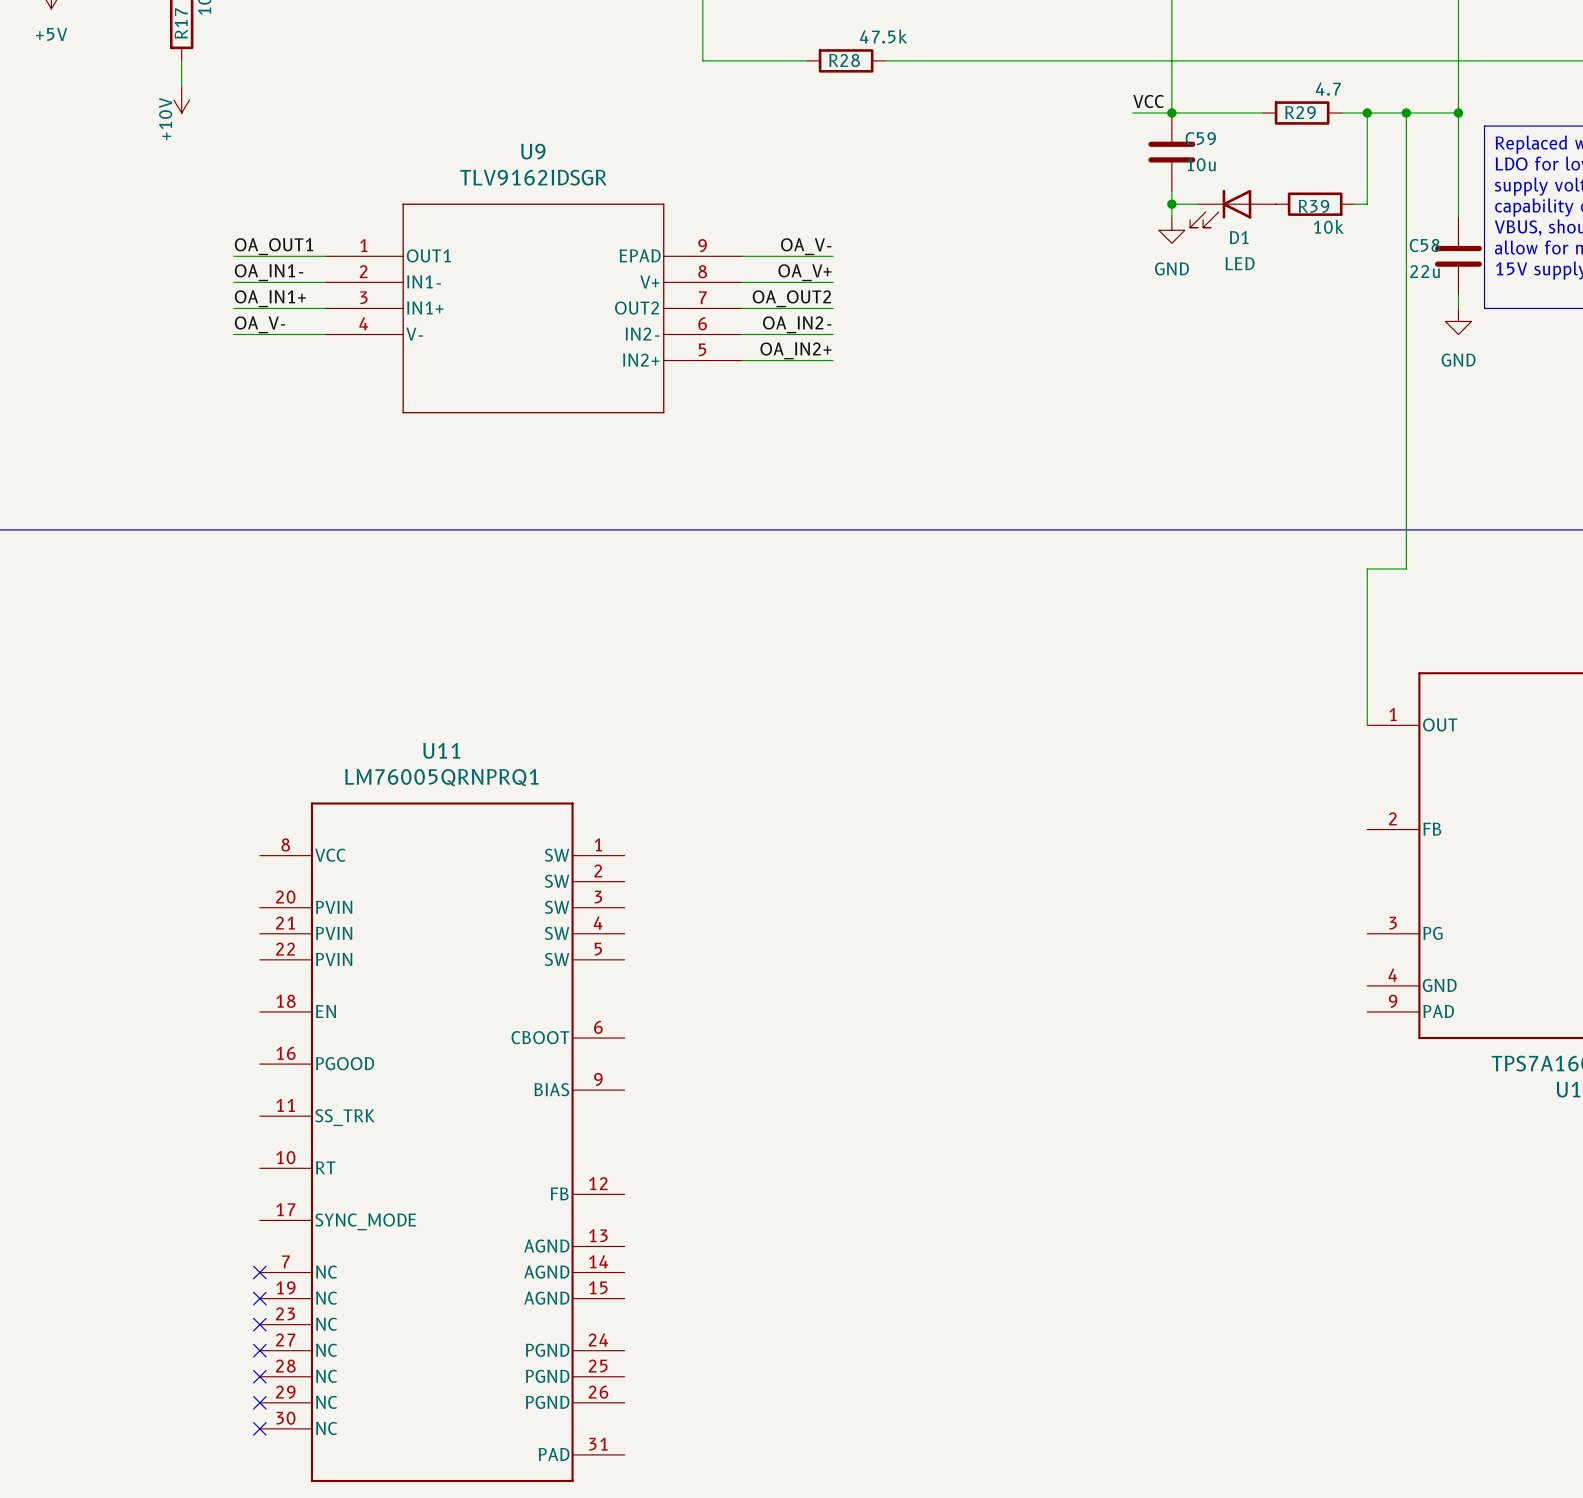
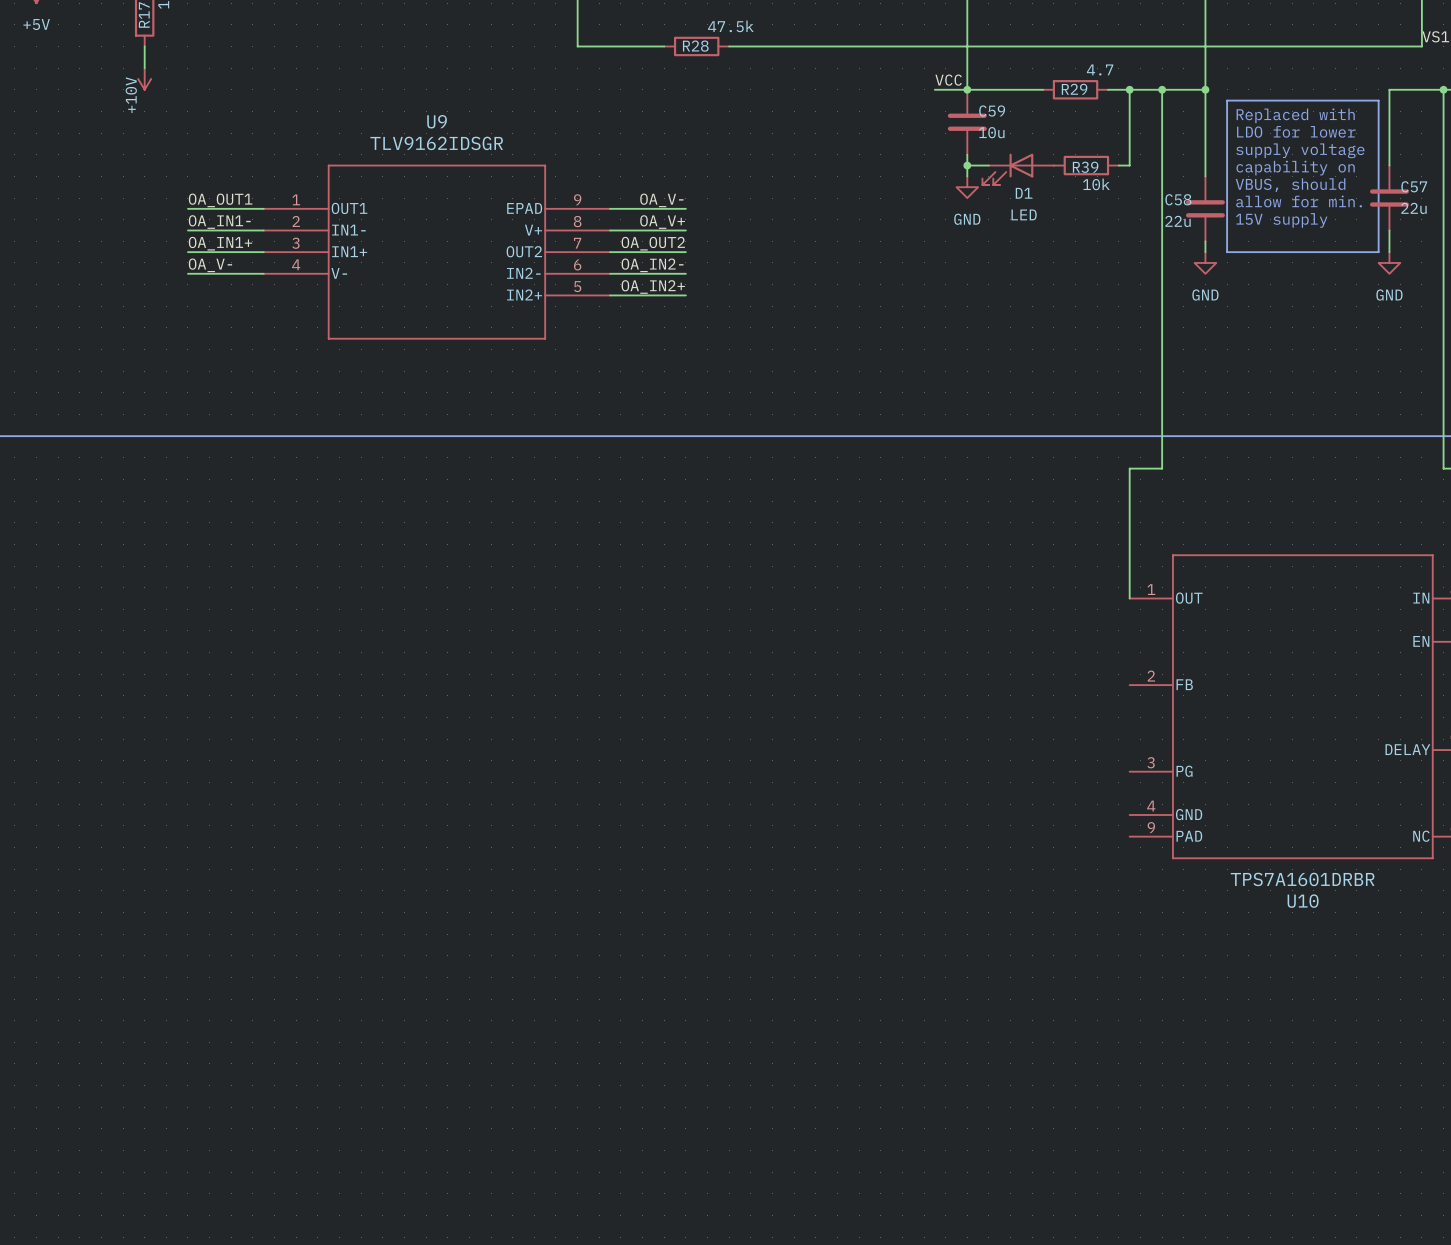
U11: LM76005QRNPRQ1 (442, 1142) -> none
no-connect mark: (259, 1272) -> none
no-connect mark: (259, 1298) -> none
no-connect mark: (259, 1324) -> none
no-connect mark: (259, 1350) -> none
no-connect mark: (259, 1376) -> none
no-connect mark: (259, 1402) -> none
no-connect mark: (259, 1428) -> none

